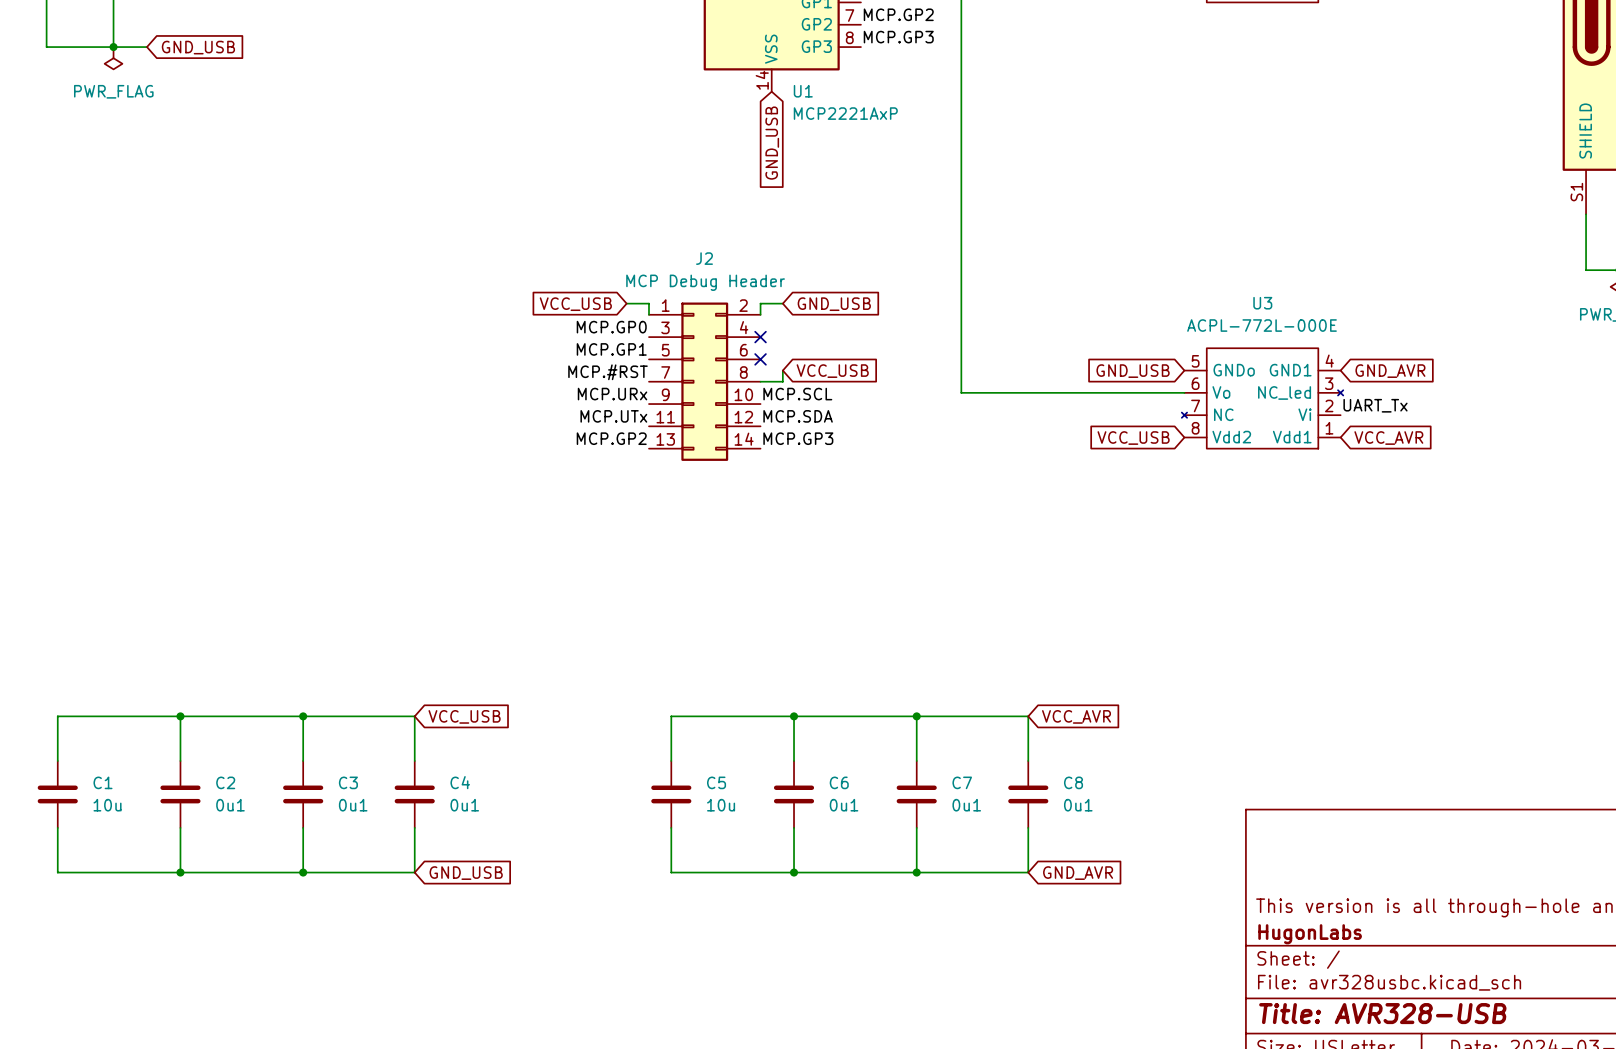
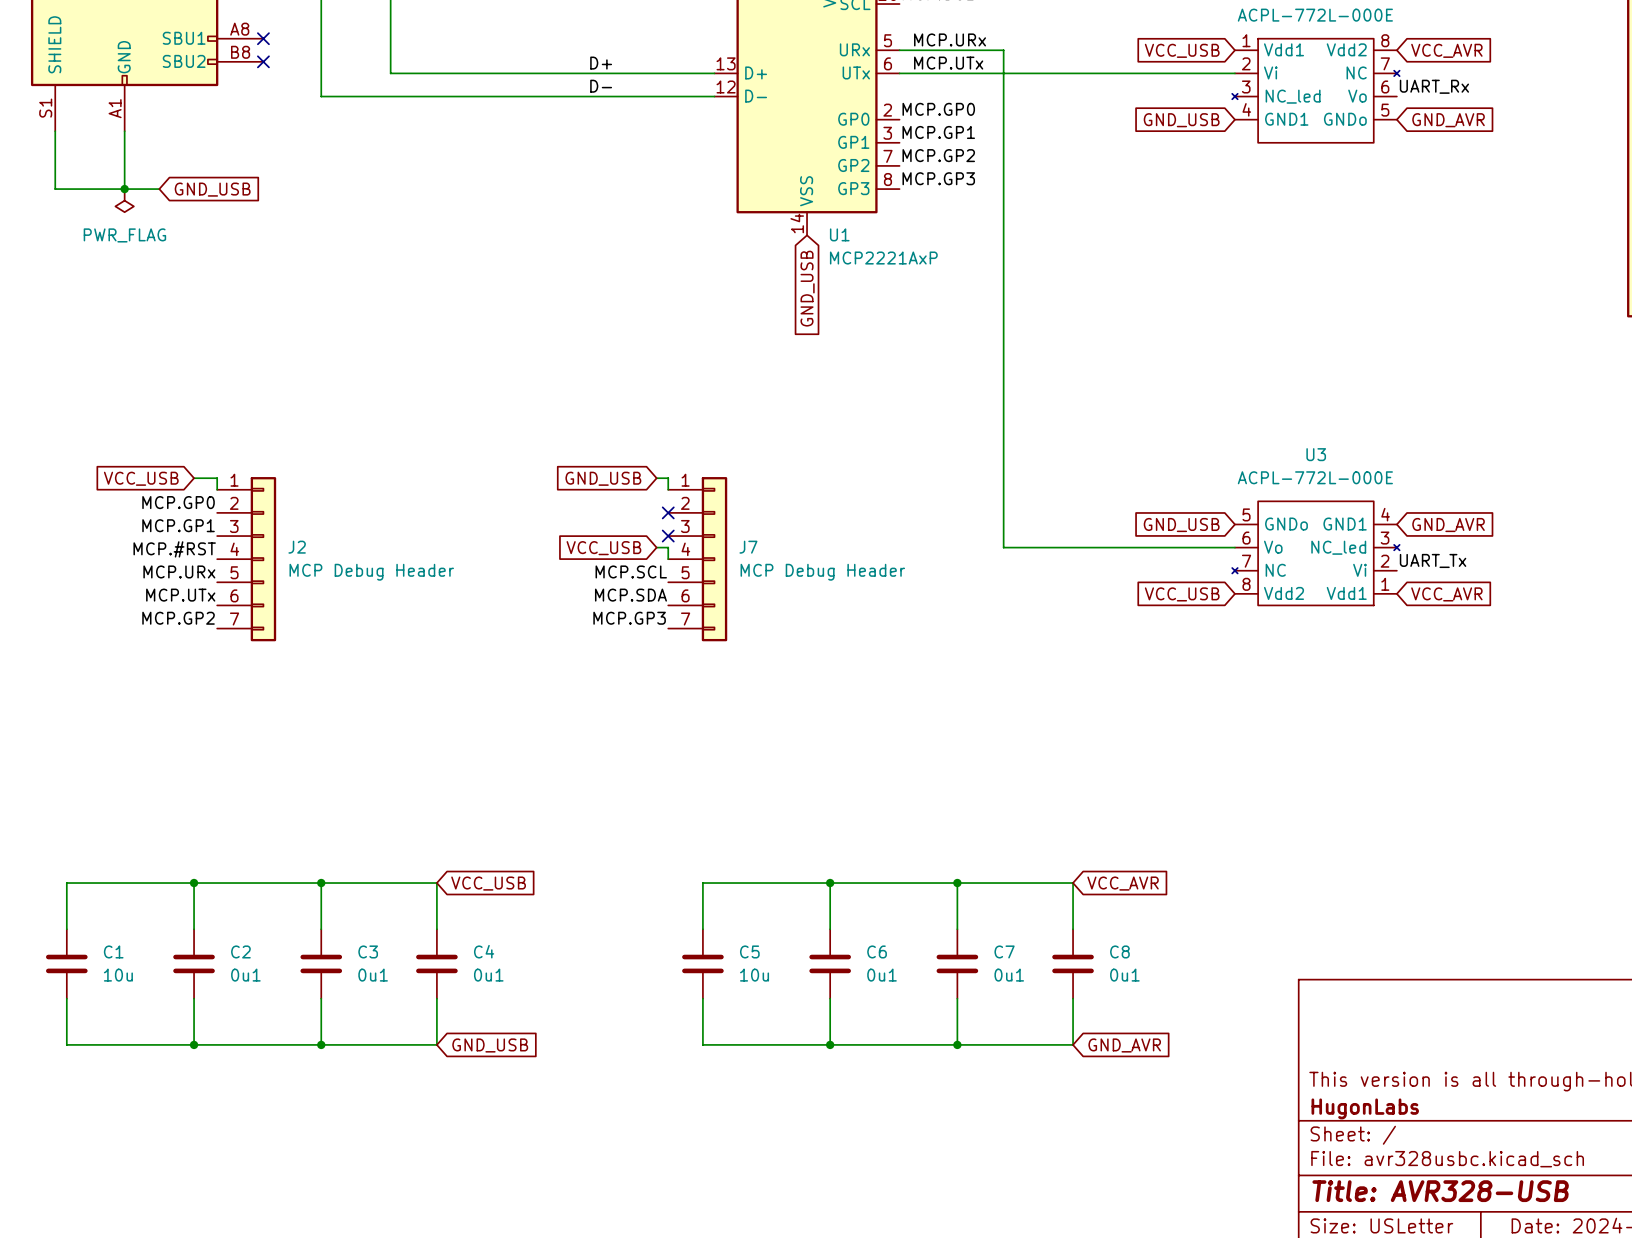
J2 name position: J2 (704, 258) -> J2 (297, 547)
J2 value position: MCP Debug Header (705, 282) -> MCP Debug Header (371, 572)
J2 symbol: [648, 302, 761, 461] -> [217, 477, 277, 642]
wire: (626, 303) (648, 303) (648, 314) -> none
wire: (782, 303) (760, 303) (760, 314) -> none
global label: VCC_USB (575, 304) -> none
global label rotation: 0° (834, 304) -> 180° (603, 478)
global label position: GND_USB (834, 304) -> GND_USB (603, 478)
wire: none -> (194, 478) (217, 478) (217, 489)
wire: none -> (656, 478) (668, 478) (668, 489)
global label: none -> VCC_USB (141, 478)
label: MCP.GP0 (611, 327) -> none
no-connect mark: (760, 337) -> none
label: none -> MCP.GP0 (178, 502)
label: MCP.GP1 (611, 349) -> none
no-connect mark: none -> (668, 512)
no-connect mark: (760, 359) -> none
wire: (782, 370) (782, 381) (760, 381) -> none
label: none -> MCP.GP1 (178, 525)
global label: VCC_USB (832, 371) -> none
label: MCP.#RST (608, 372) -> none
no-connect mark: none -> (668, 536)
wire: none -> (656, 547) (668, 547) (668, 559)
global label: none -> VCC_USB (603, 548)
label: none -> MCP.#RST (174, 549)
label: MCP.URx (612, 394) -> none
label position: MCP.SCL (797, 394) -> MCP.SCL (631, 571)
J7: none -> MCP Debug Header (697, 559)
label: none -> MCP.URx (179, 571)
label: MCP.UTx (613, 416) -> none
label position: MCP.SDA (798, 416) -> MCP.SDA (630, 595)
label: none -> MCP.UTx (180, 595)
label: MCP.GP2 (611, 438) -> none
label position: MCP.GP3 (798, 438) -> MCP.GP3 (629, 618)
label: none -> MCP.GP2 (178, 618)

